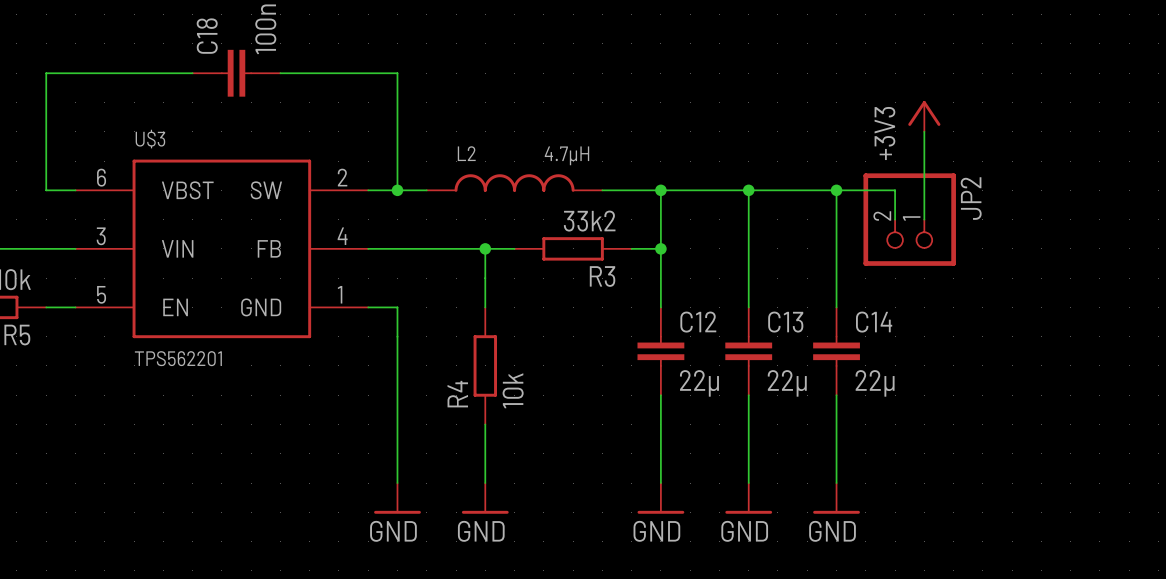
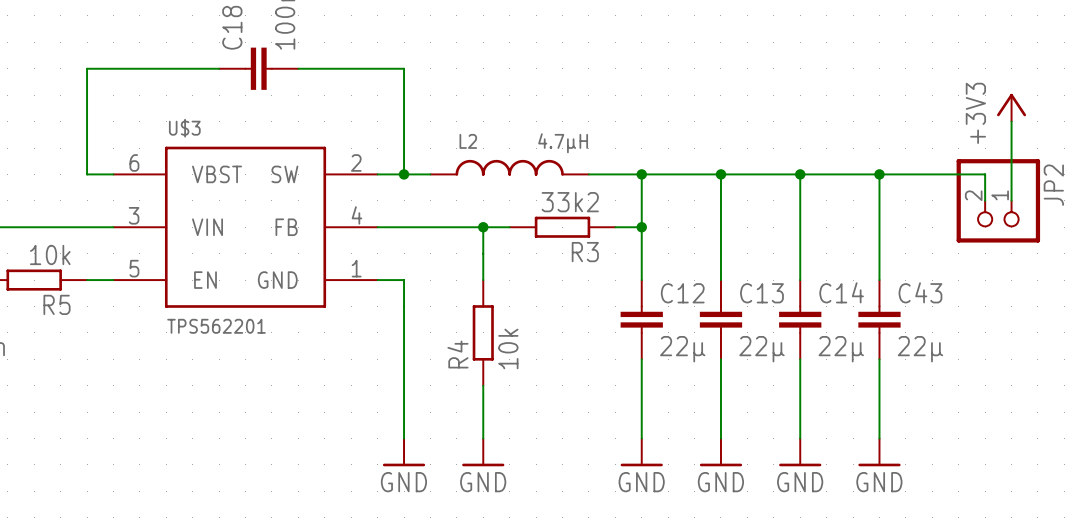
power symbol position: +3V3 (924, 116) -> +3V3 (1011, 107)
wire: (924, 131) (924, 190) -> none
wire: none -> (1011, 121) (1011, 200)
wire: (895, 190) (895, 219) -> (853, 174) (985, 174) (985, 200)
junction: none -> (879, 174)
JP2 position: (909, 219) -> (998, 200)
wire: none -> (879, 200) (879, 280)
C43: none -> 22µ (879, 319)
wire: none -> (879, 359) (879, 438)
power symbol: none -> GND (879, 452)

